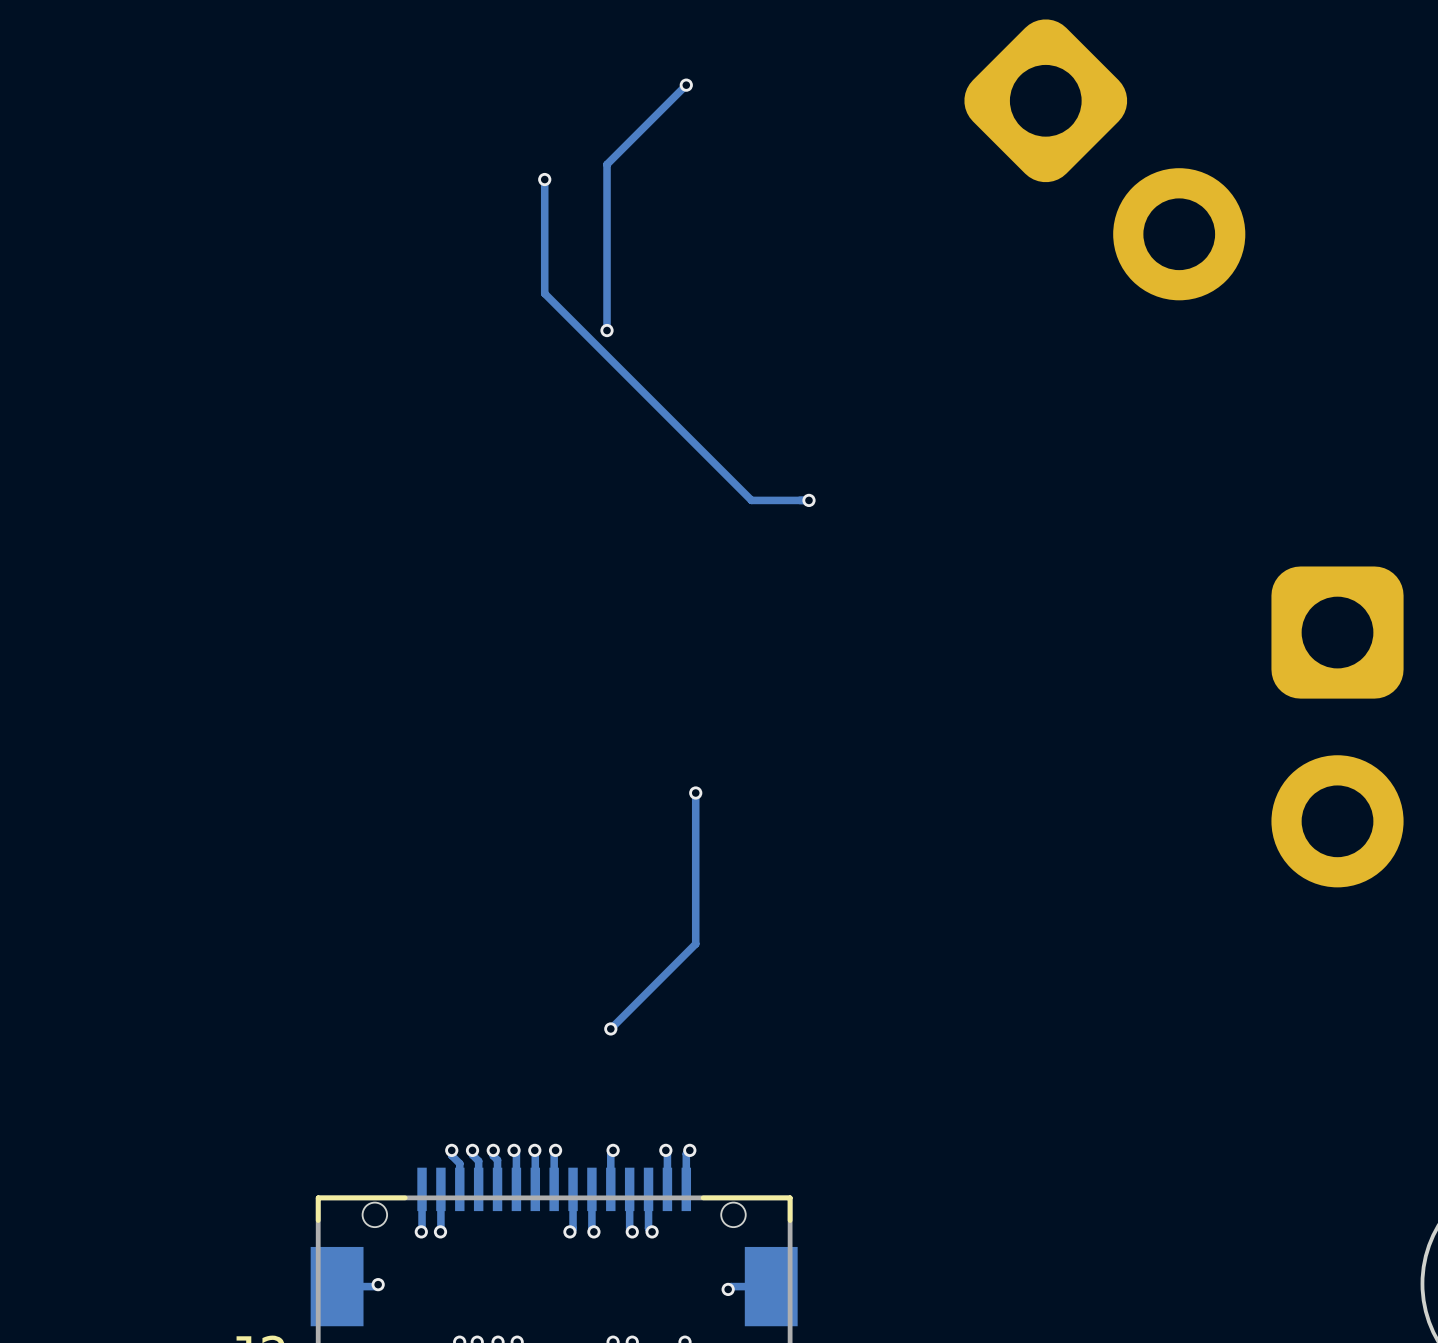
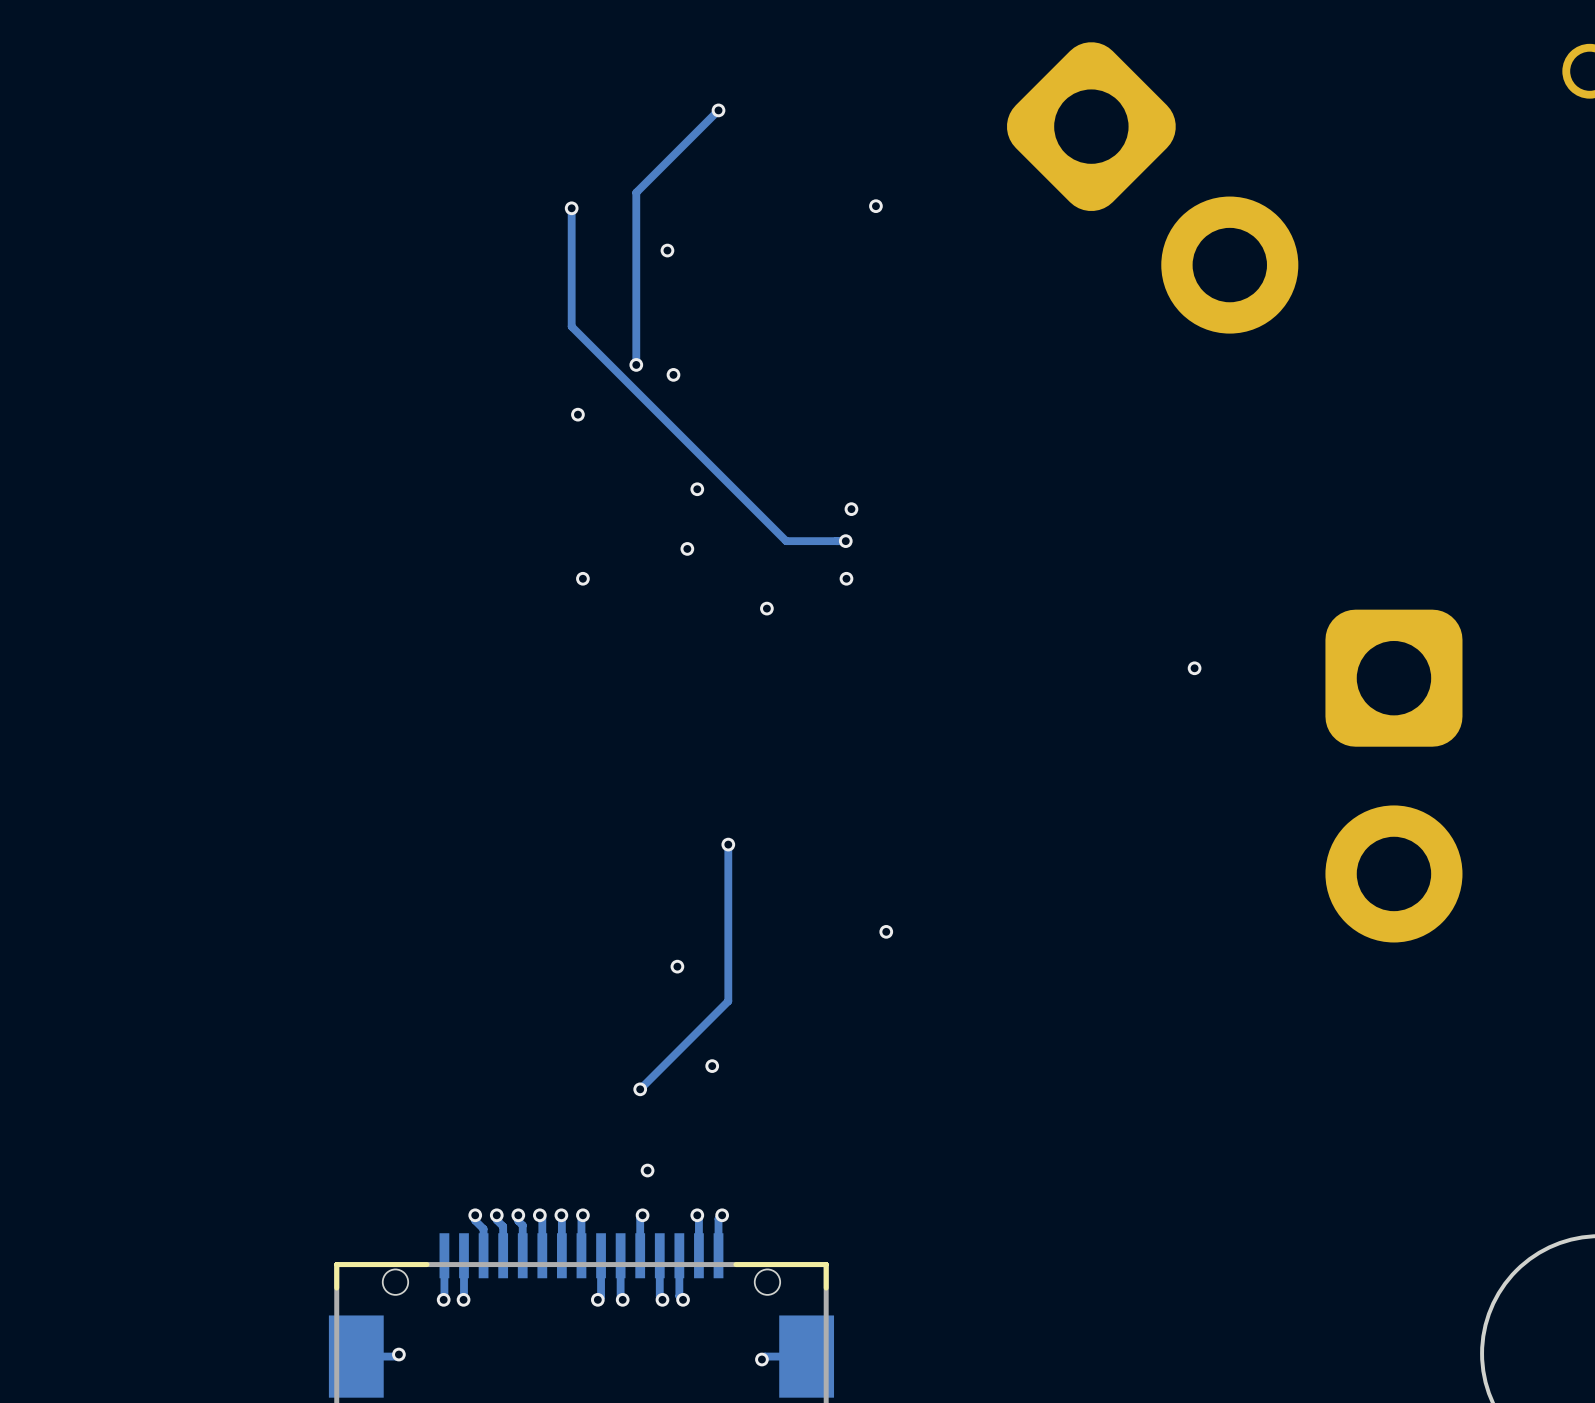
via: none -> (875, 206)
via: none -> (667, 250)
via: none -> (673, 374)
via: none -> (577, 414)
via: none -> (697, 489)
via: none -> (851, 509)
via: none -> (687, 548)
via: none -> (582, 578)
via: none -> (846, 578)
via: none -> (766, 608)
via: none -> (1194, 668)
via: none -> (886, 931)
via: none -> (677, 966)
via: none -> (712, 1066)
via: none -> (647, 1170)

